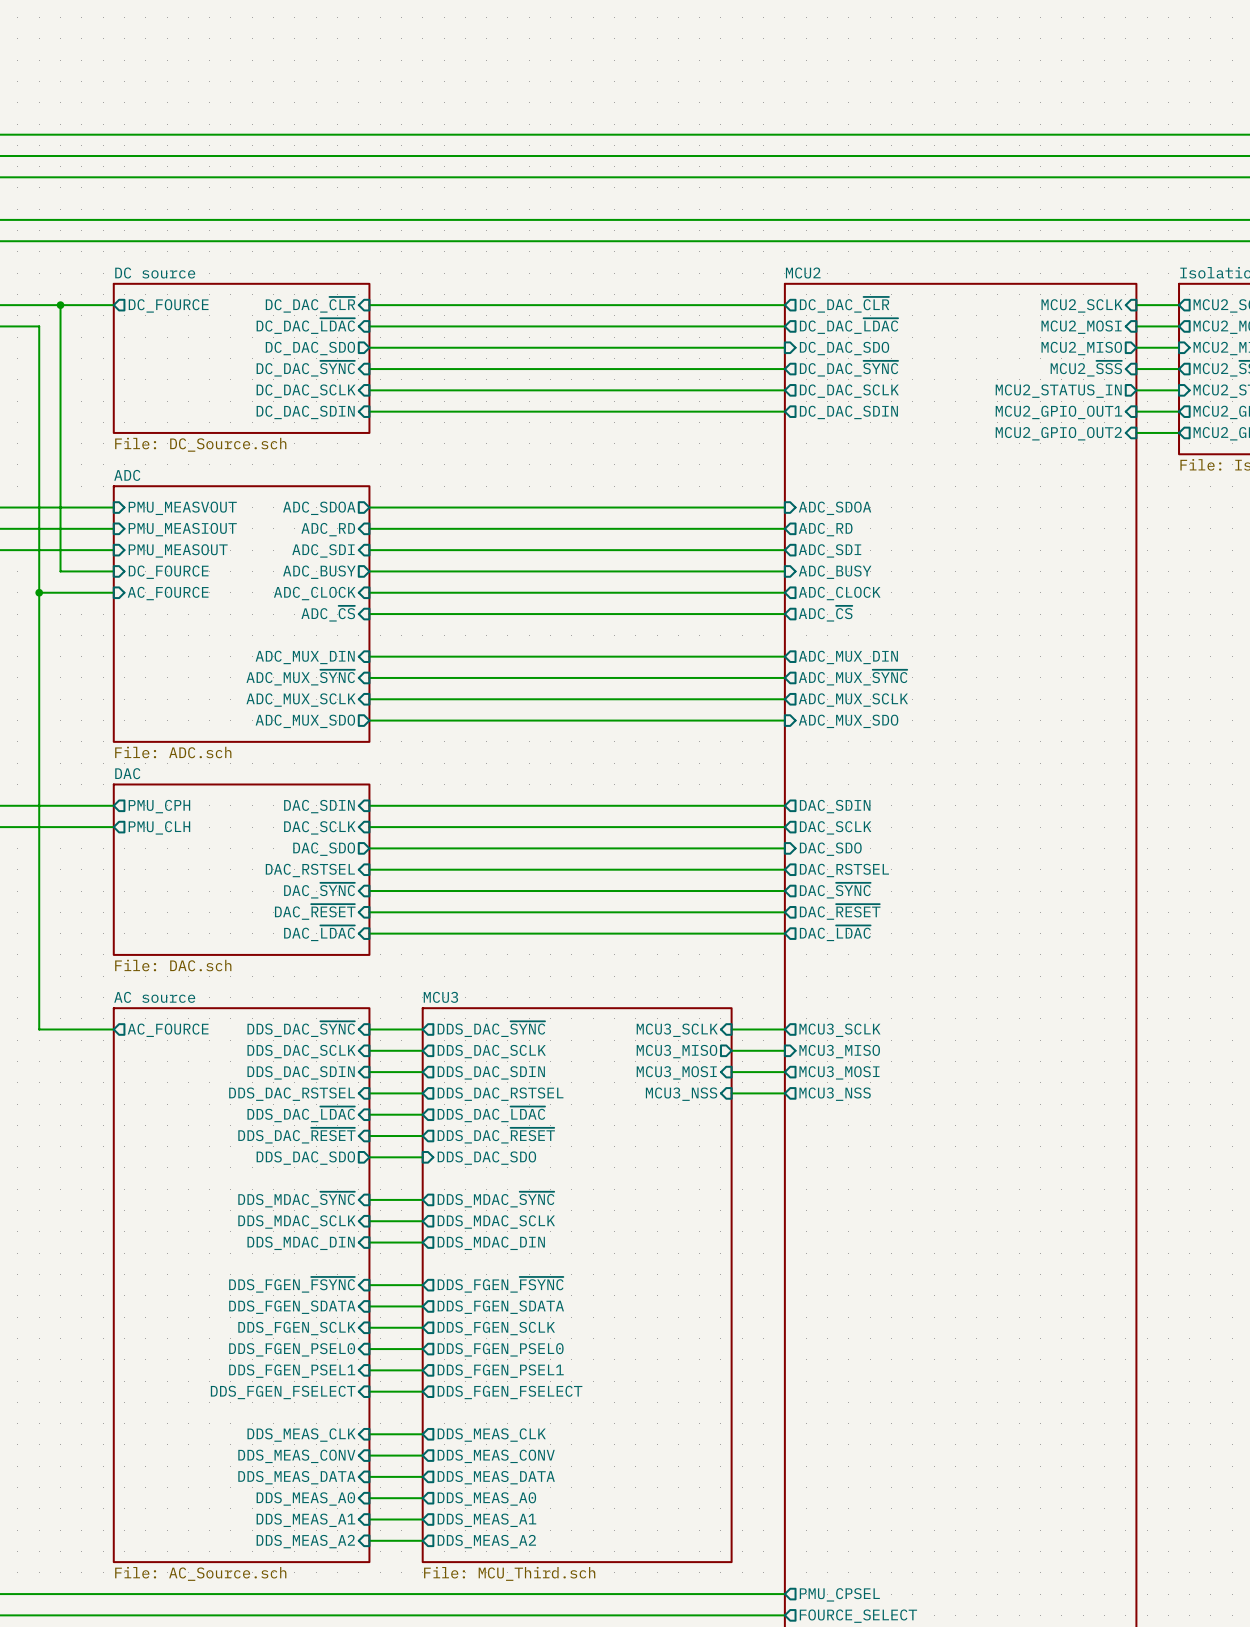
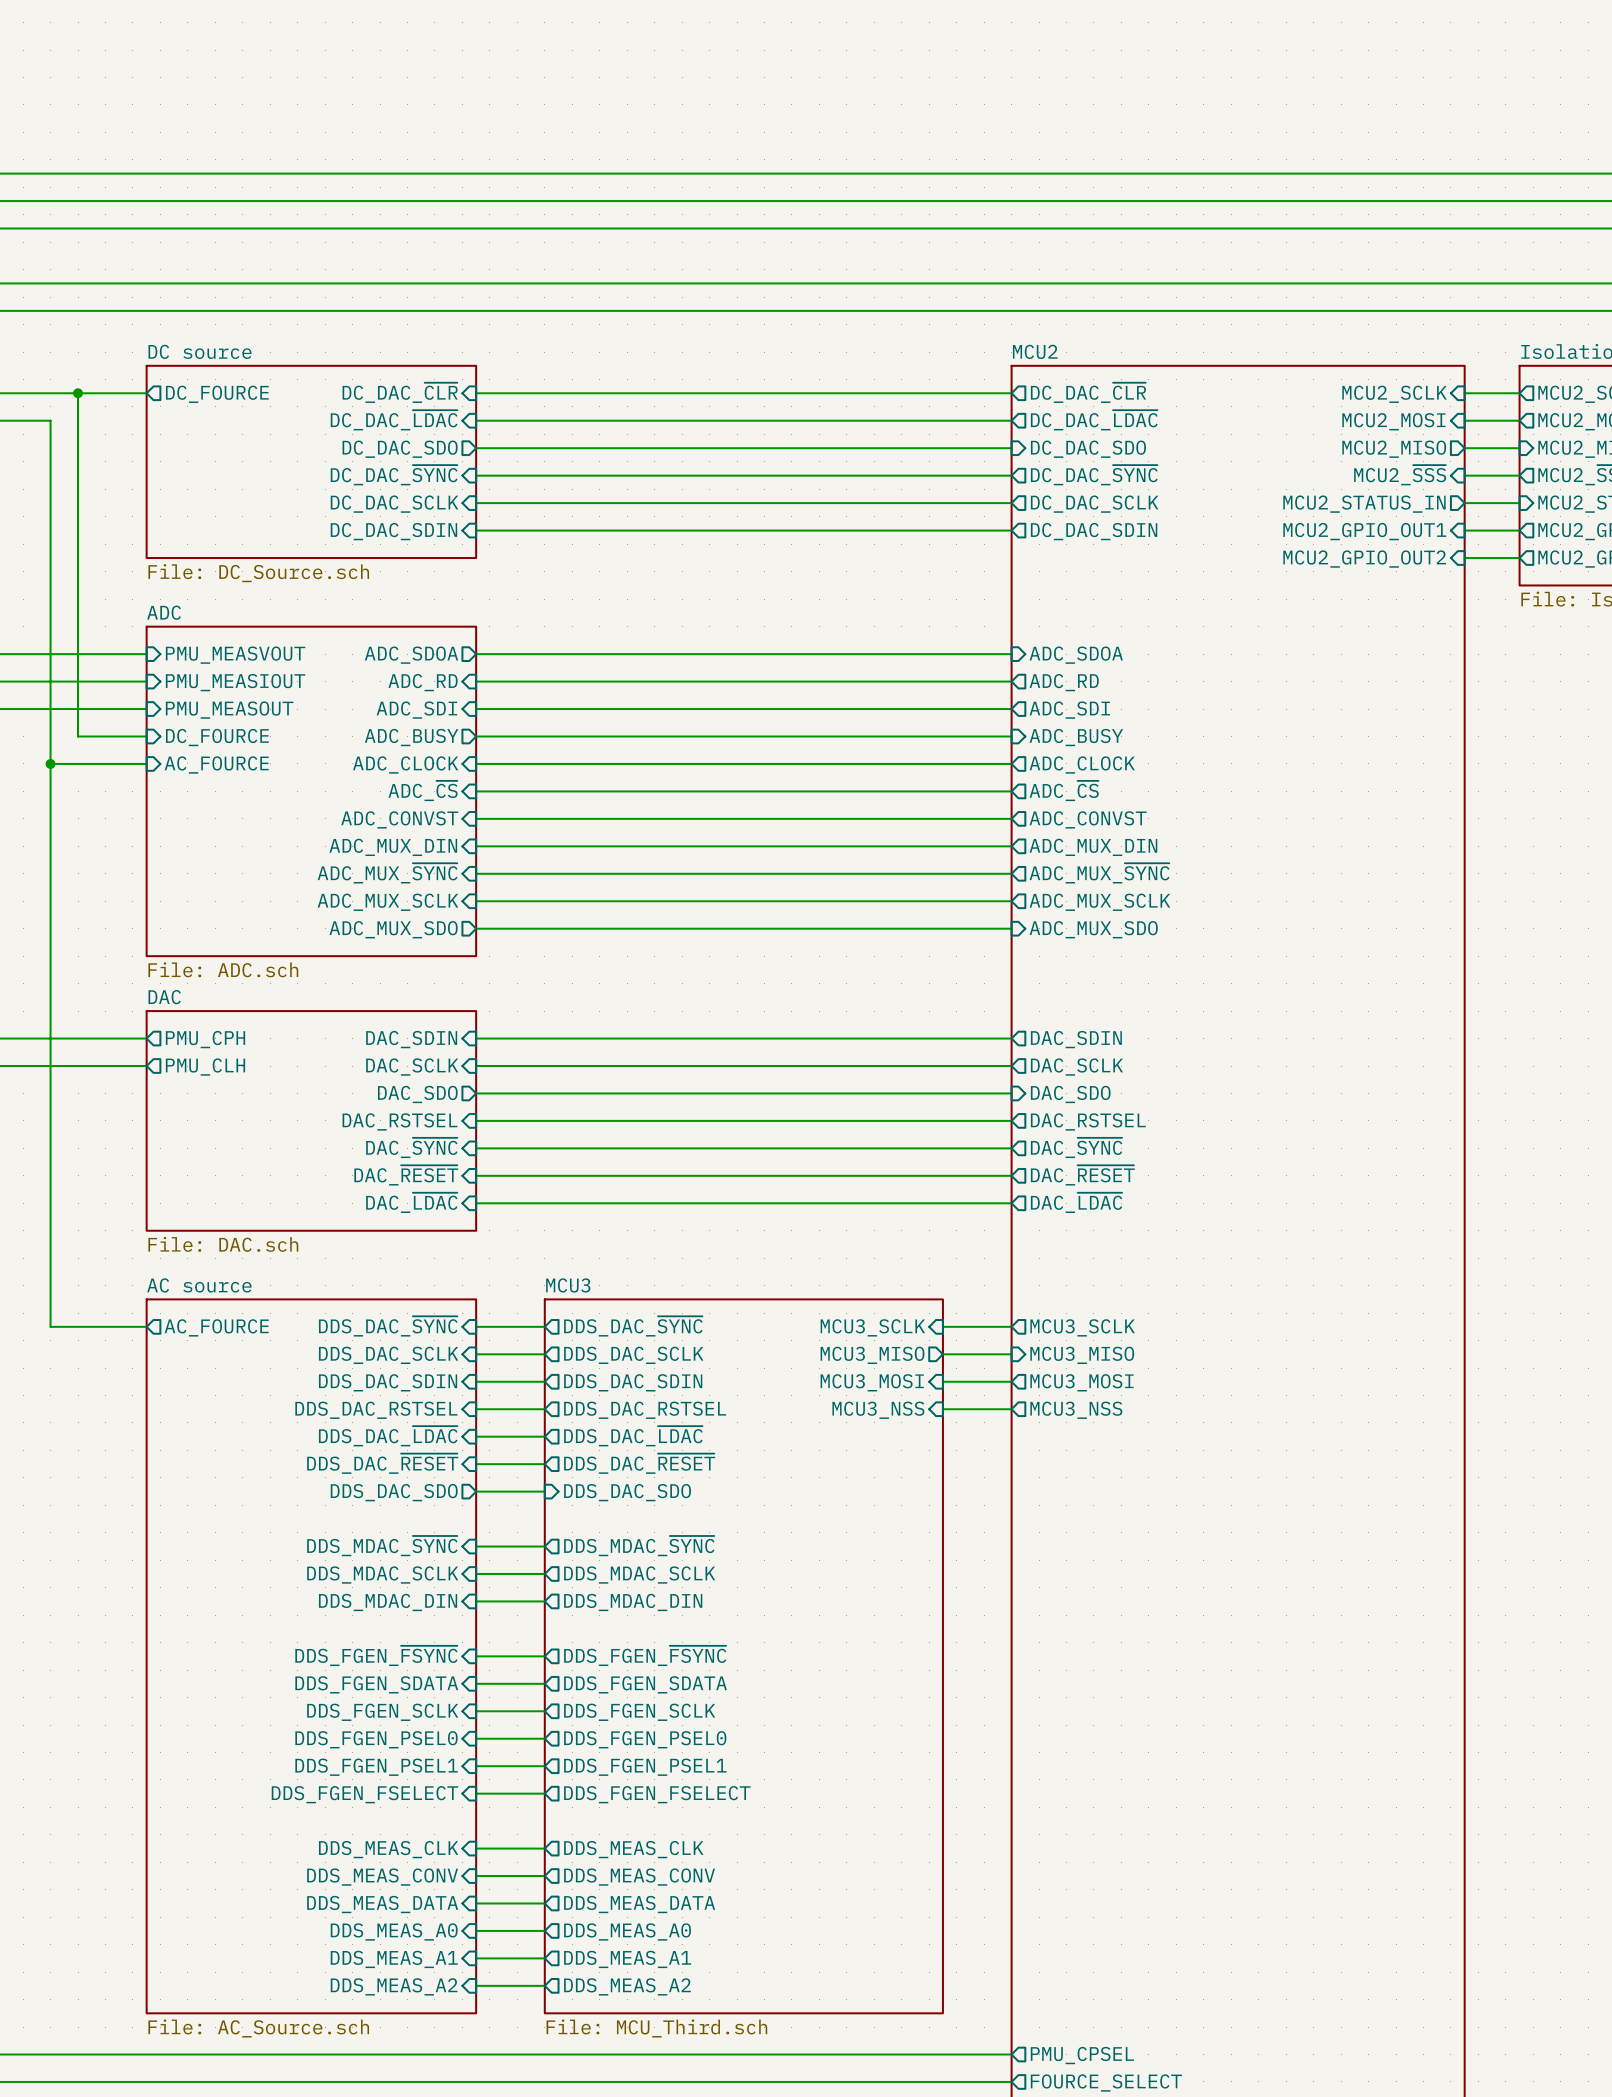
wire: none -> (476, 818) (1011, 818)
sheet pin: none -> ADC_CONVST (399, 819)
sheet pin: none -> ADC_CONVST (1088, 819)

